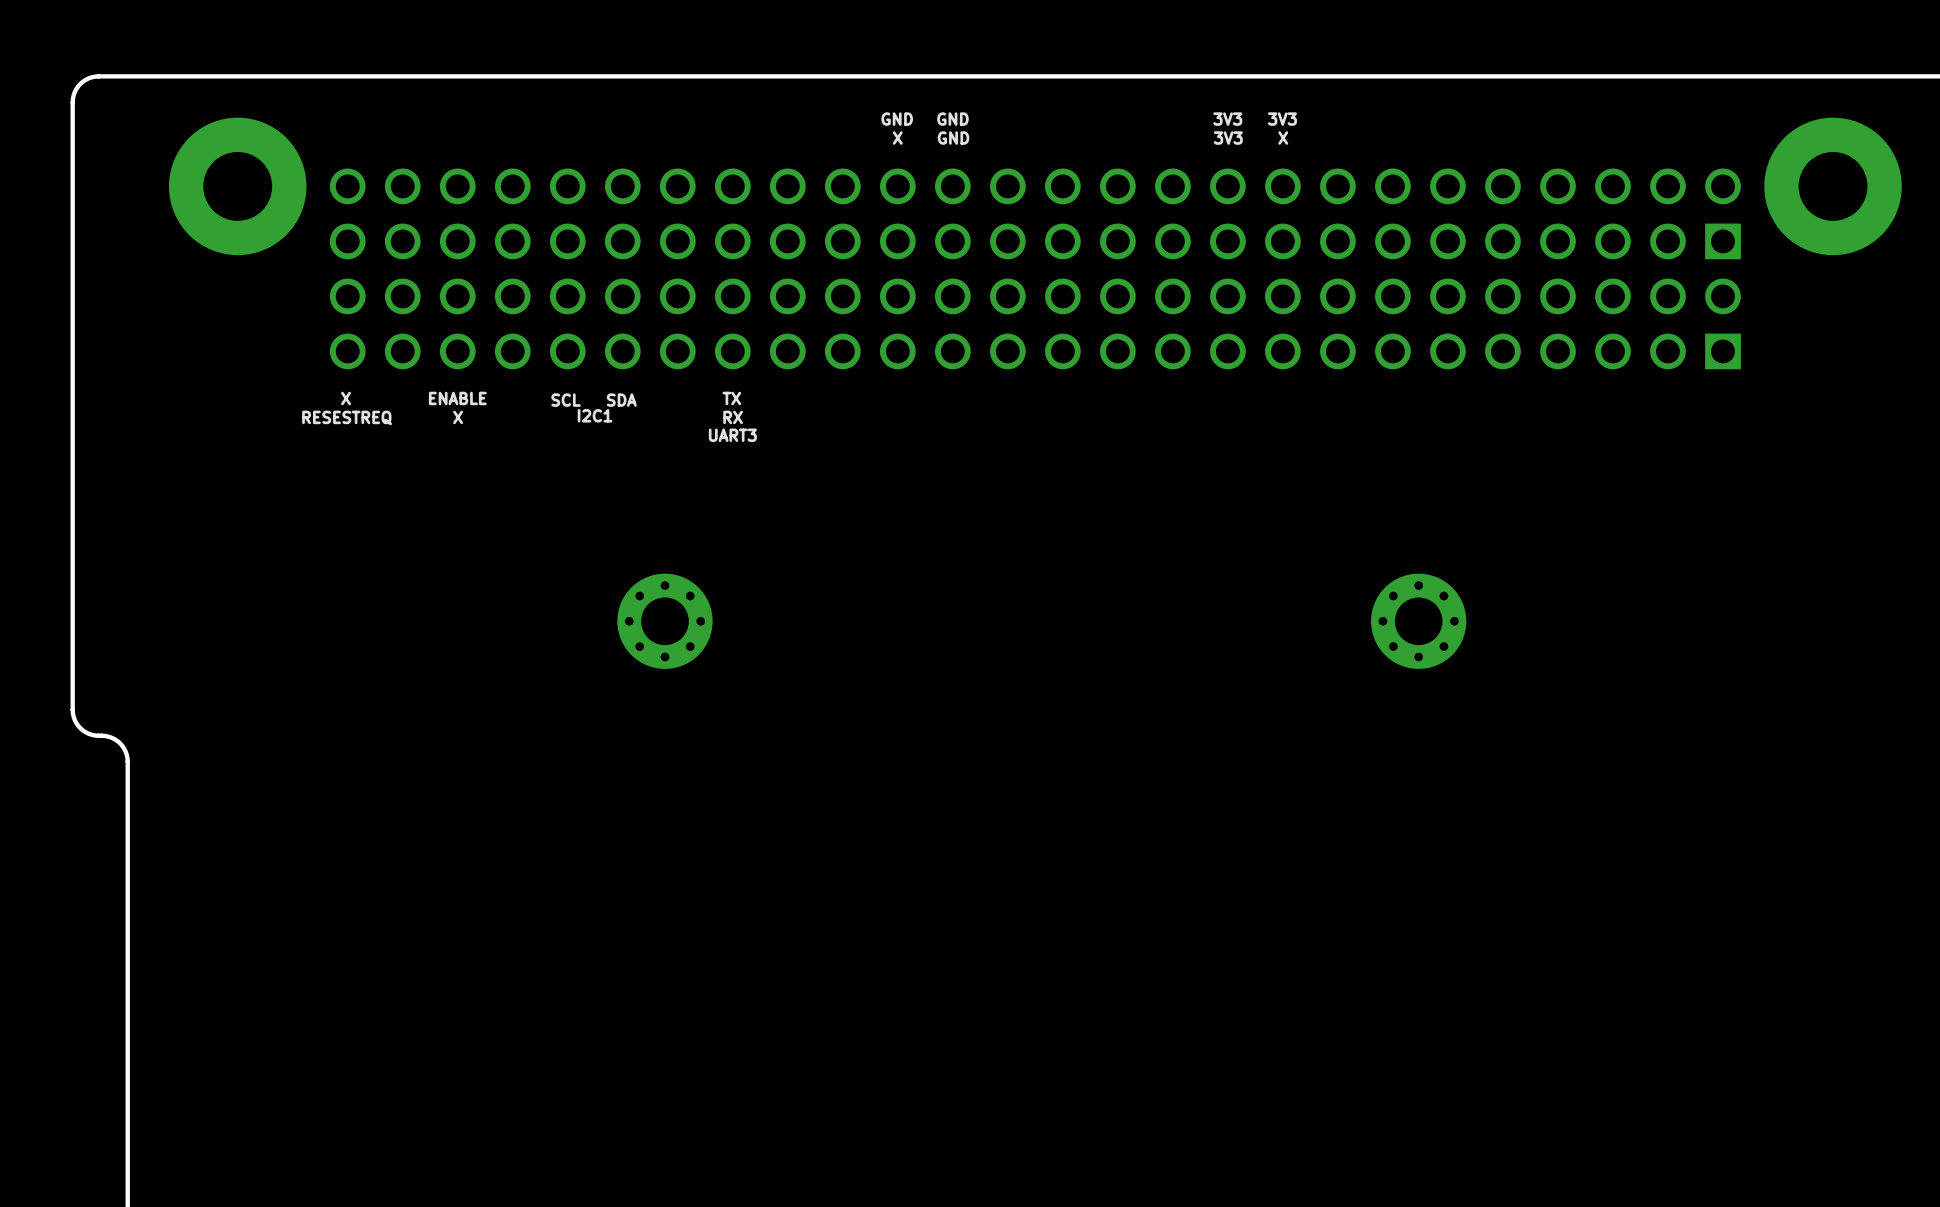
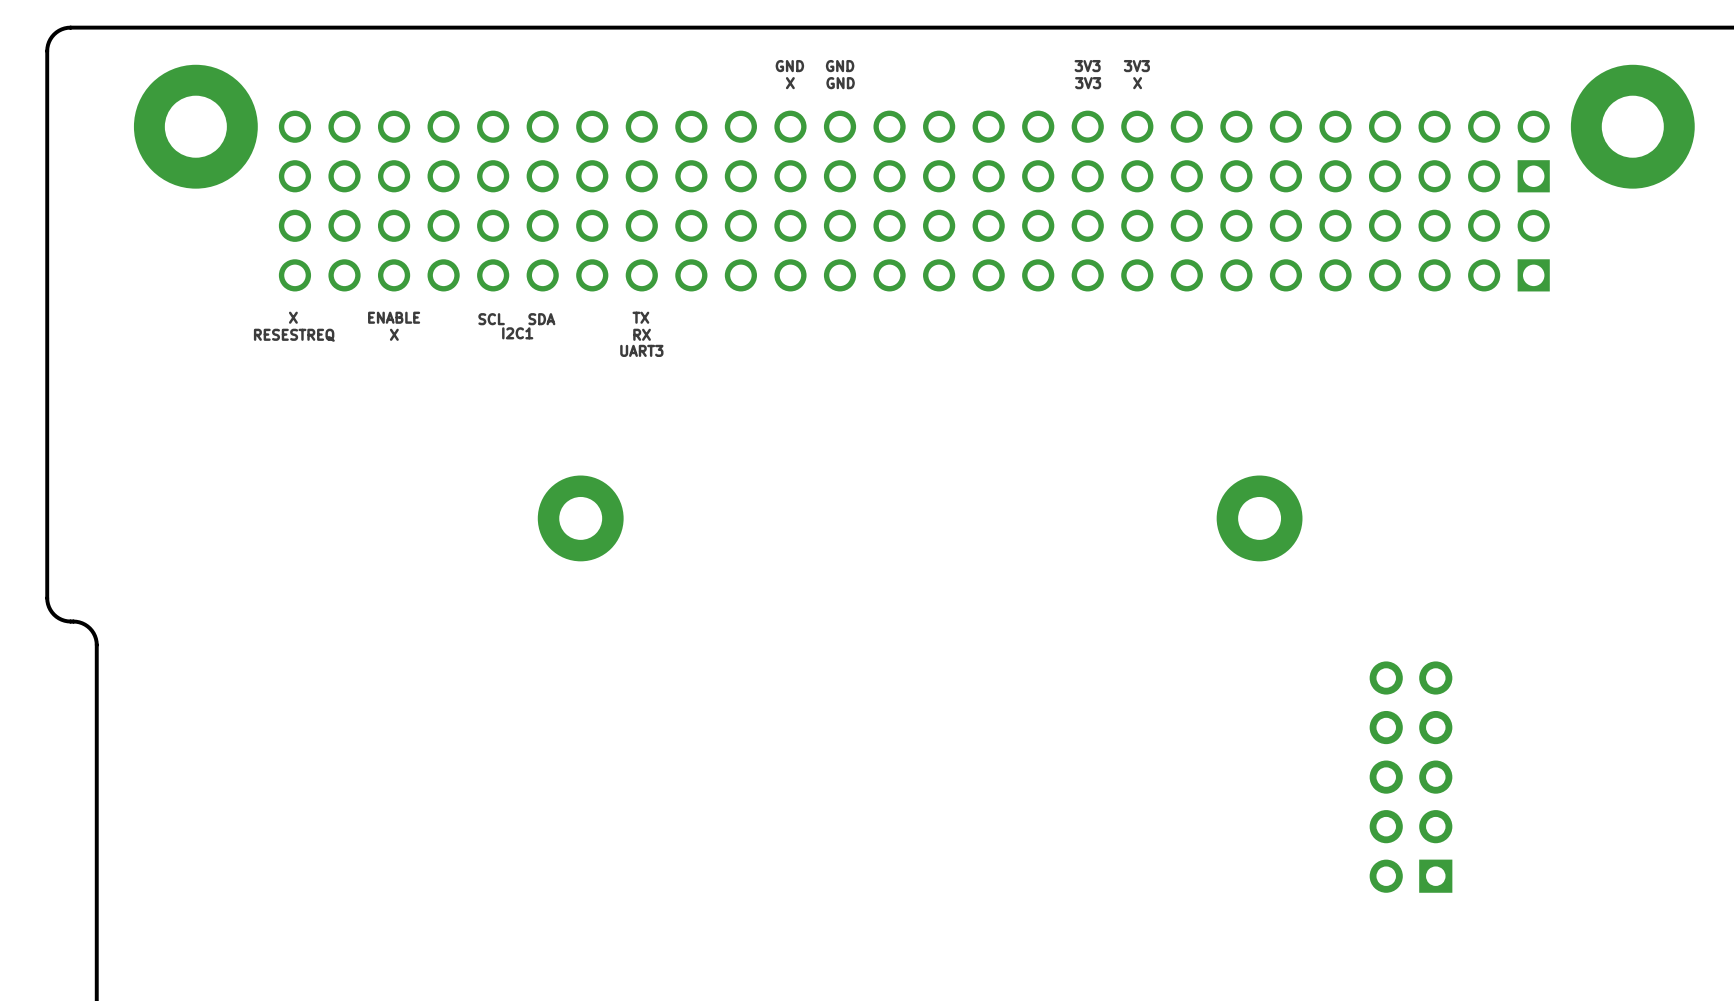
part footprint: [617, 573, 713, 669] -> [537, 475, 624, 562]
part footprint: [1371, 573, 1467, 669] -> [1216, 475, 1303, 562]
part: none -> (1411, 777)

